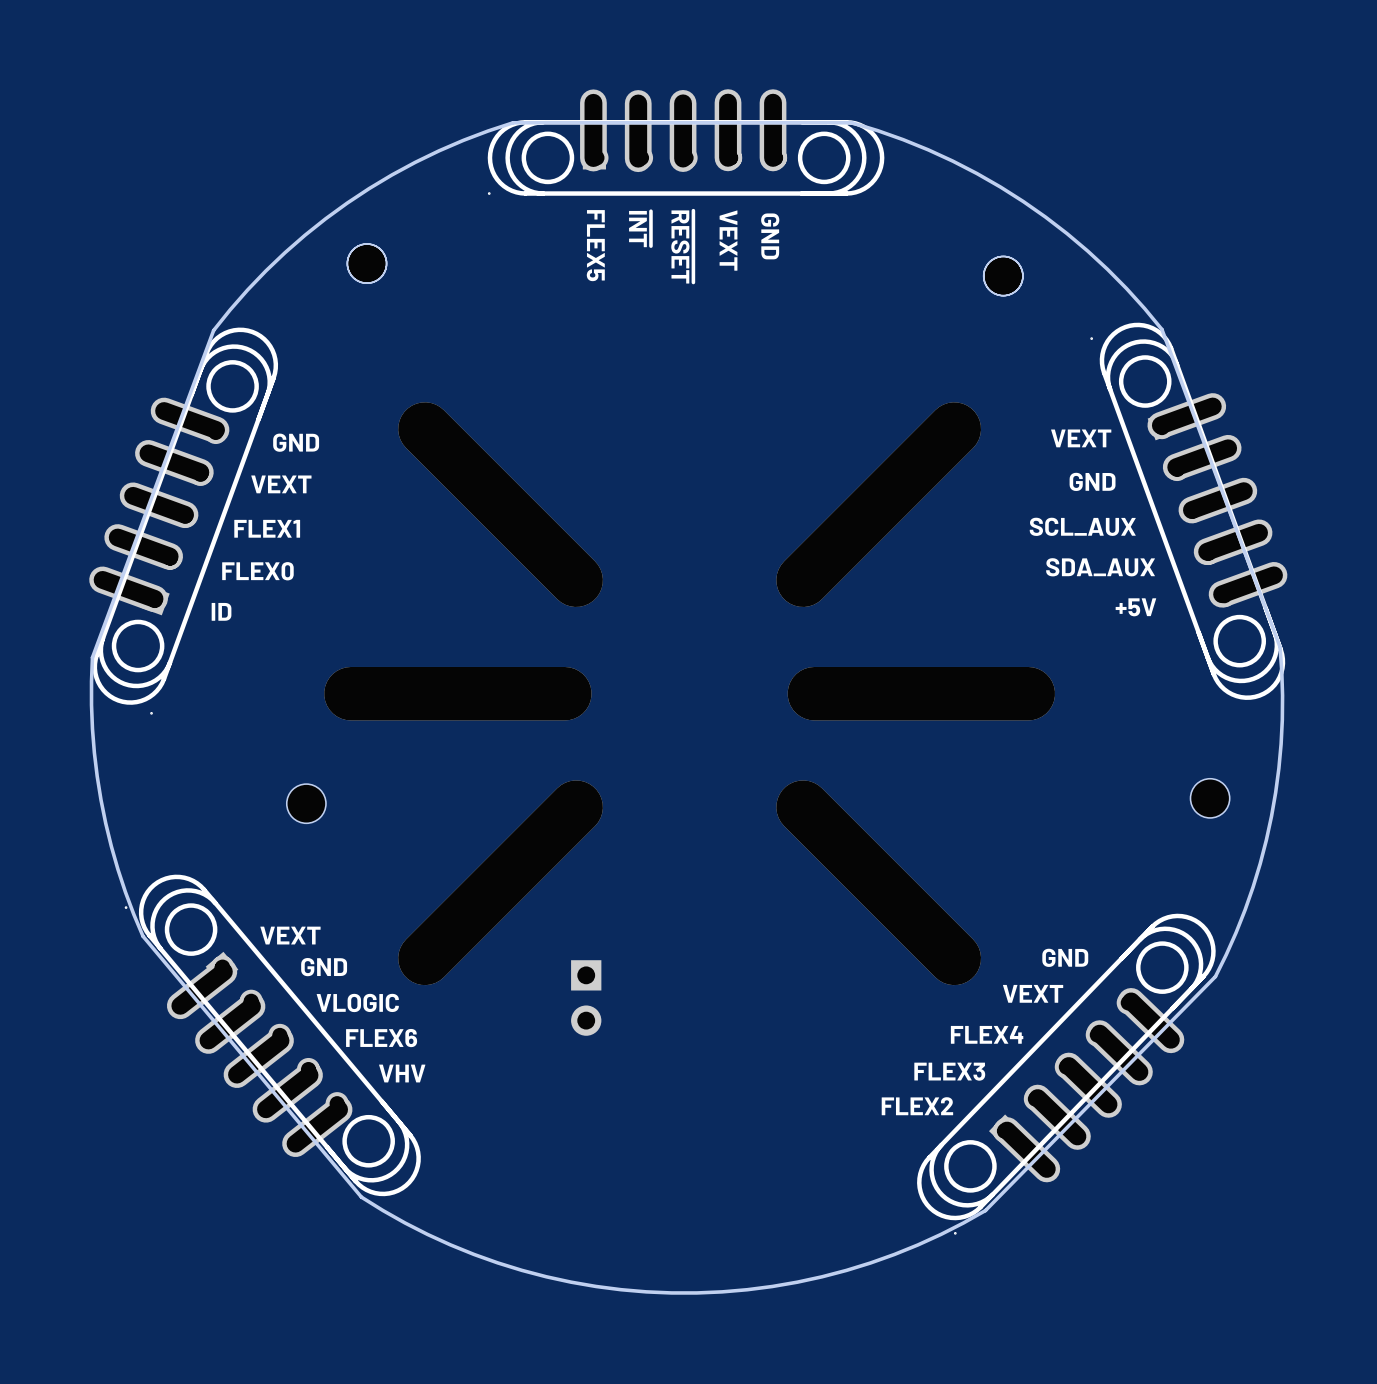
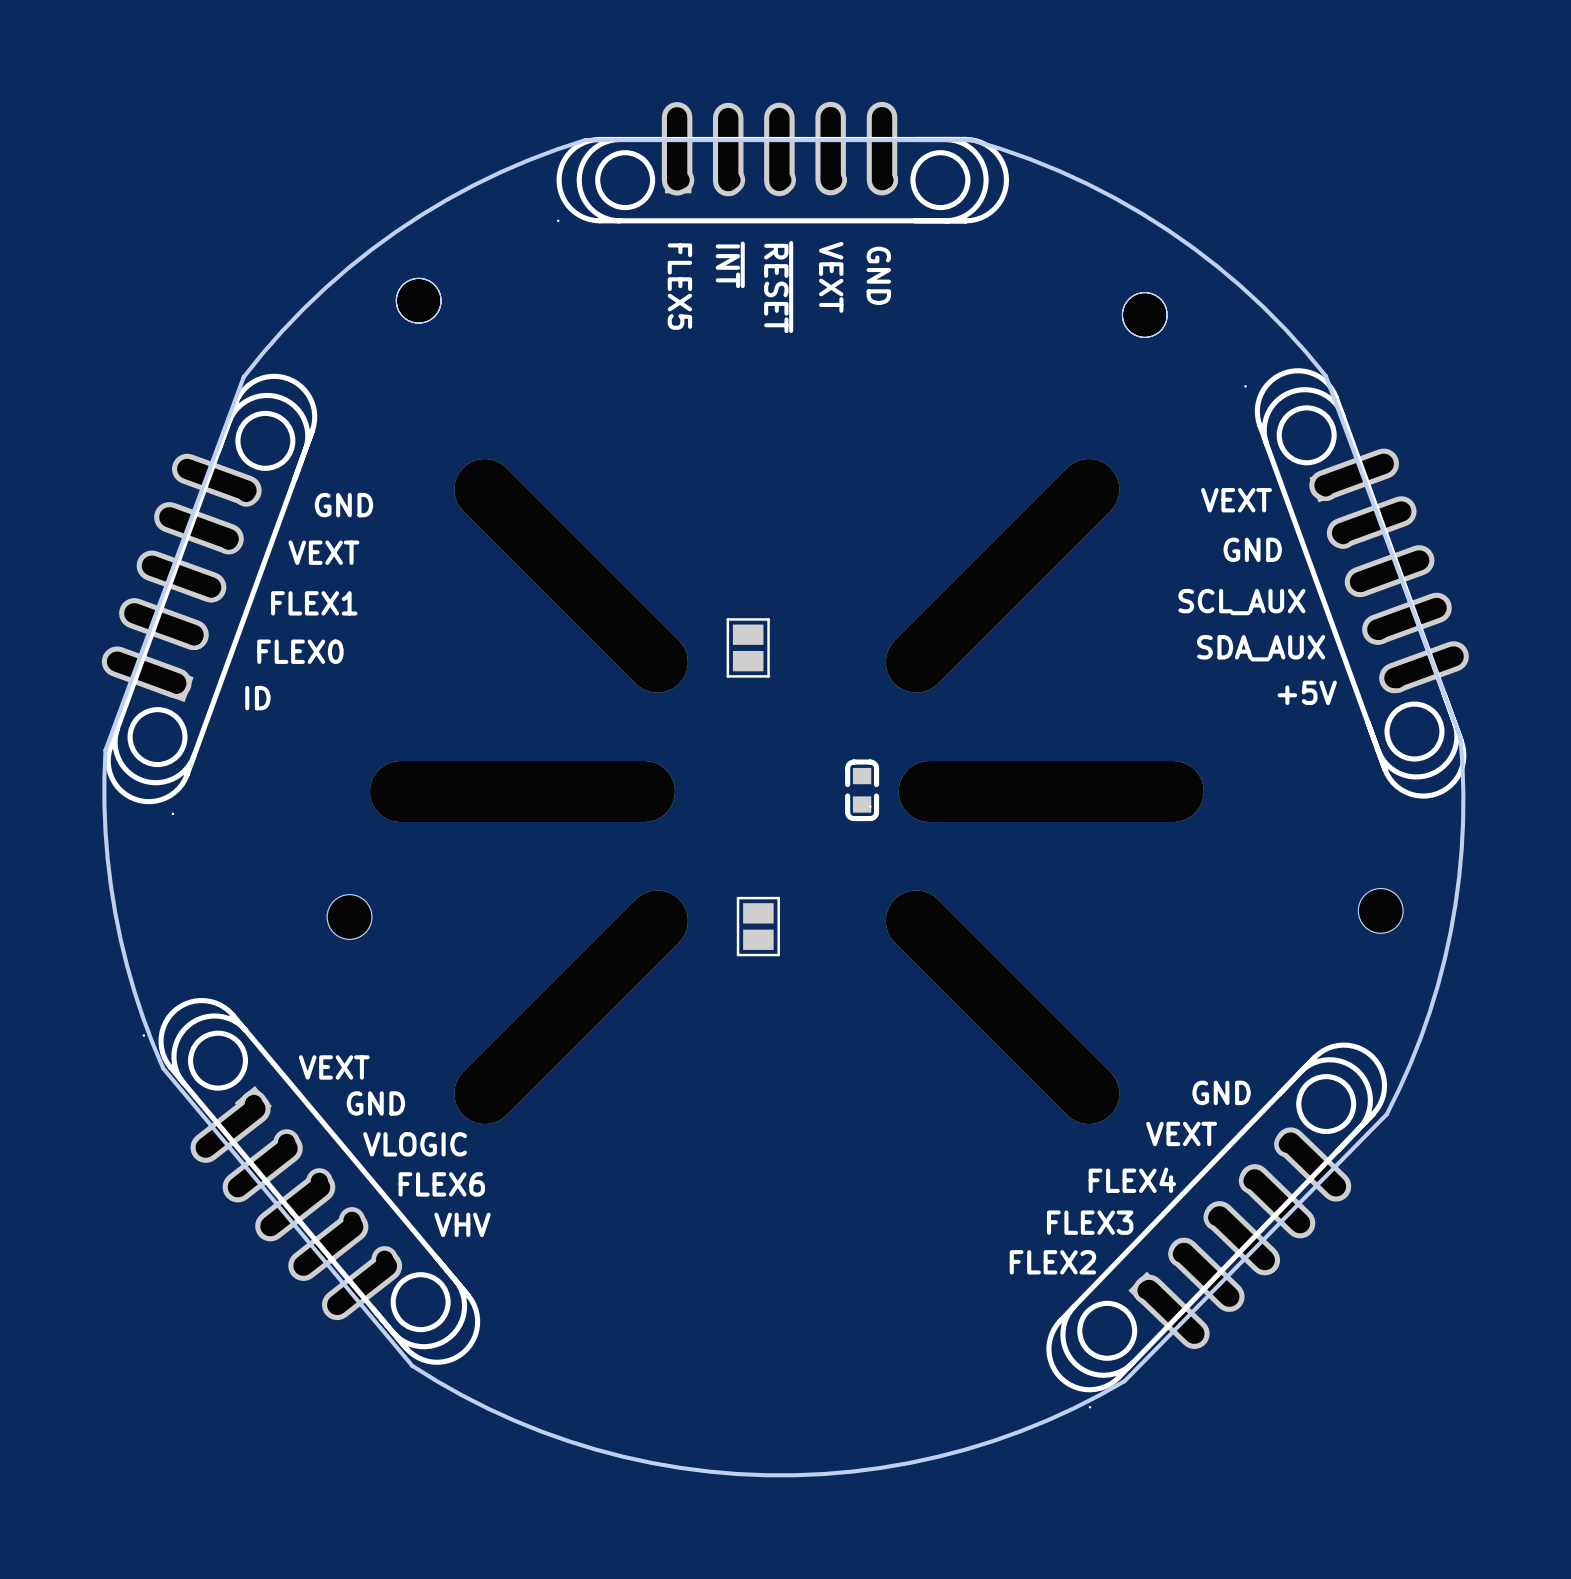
part: none -> (748, 647)
part: none -> (862, 790)
part: none -> (758, 926)
part: (586, 997) -> none

